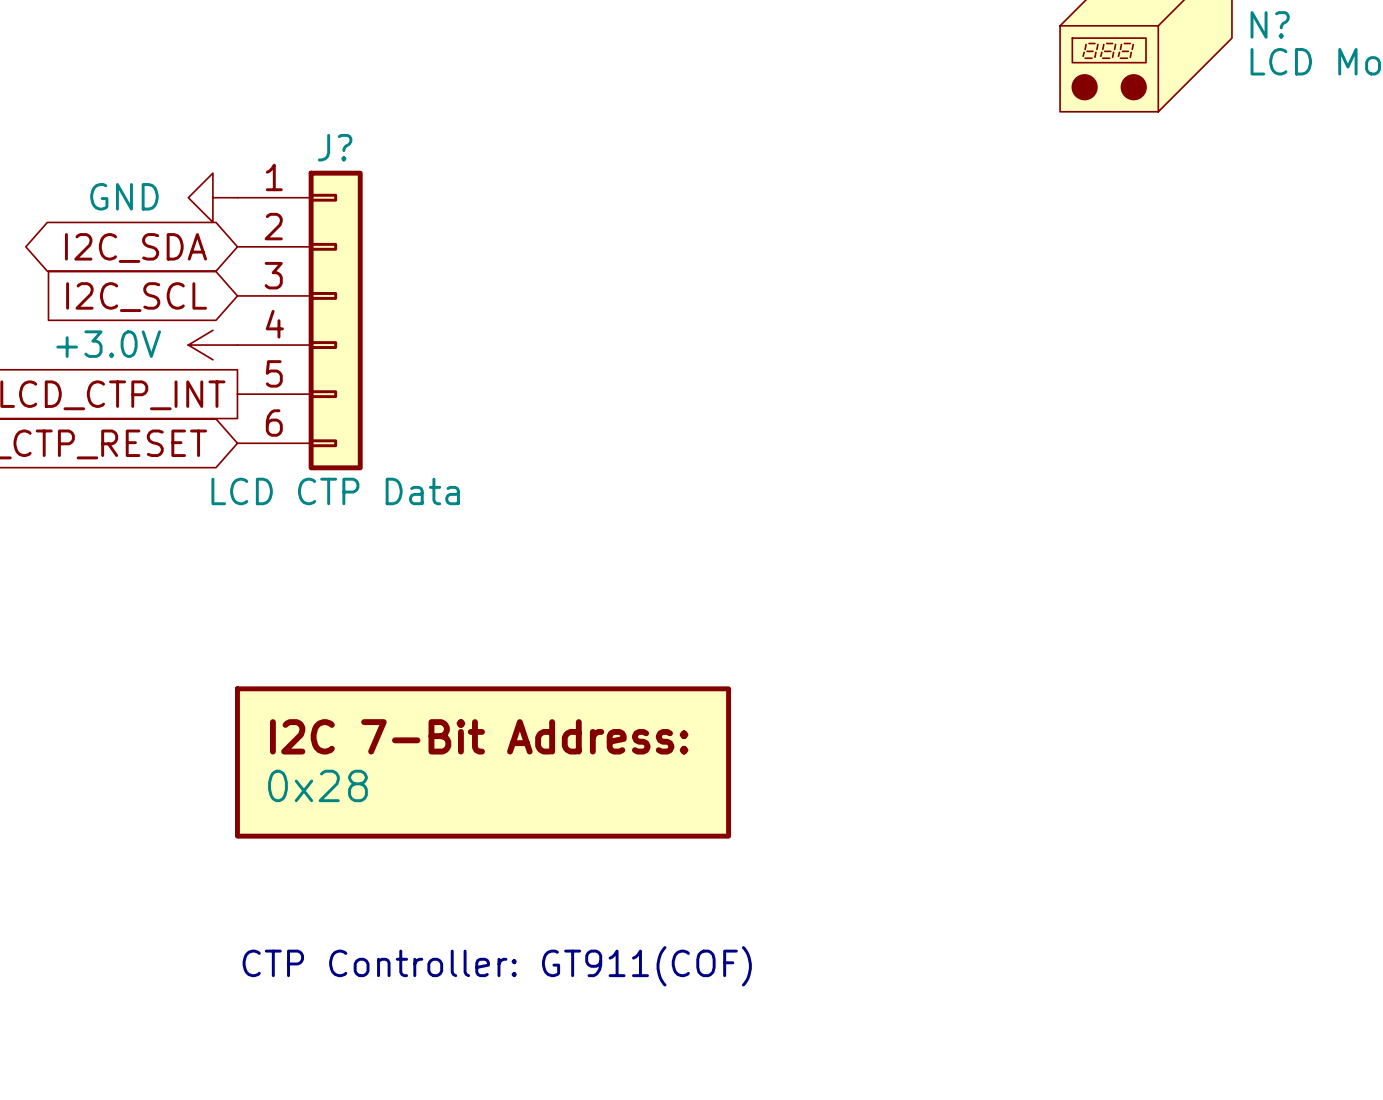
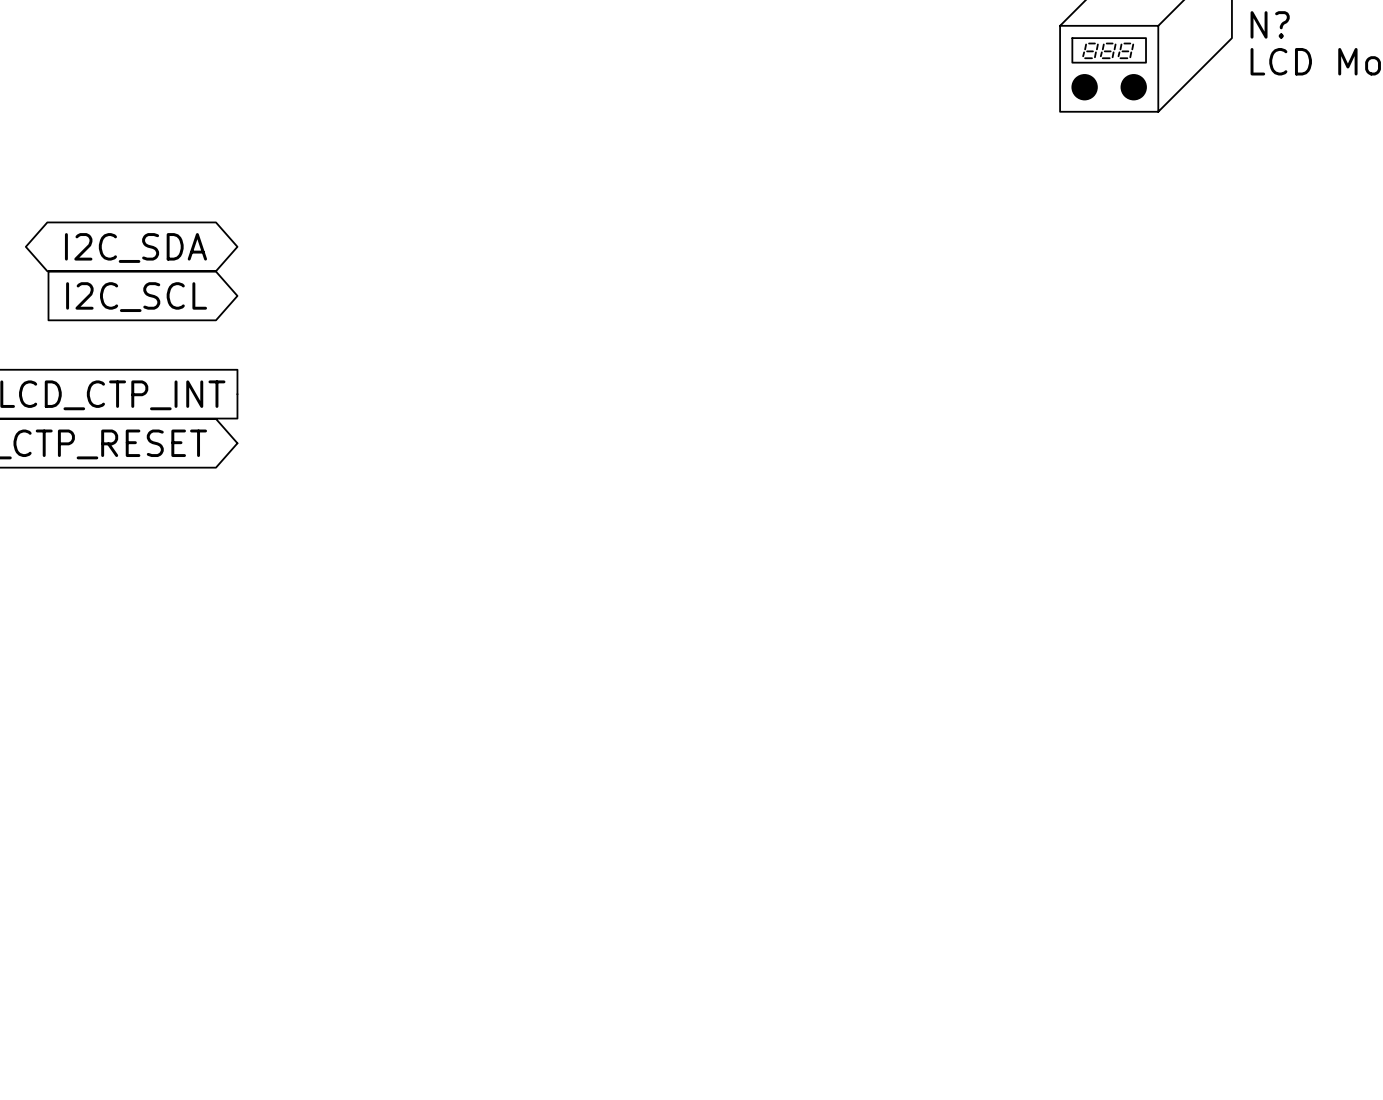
power symbol: GND (212, 197) -> none
J?: LCD CTP Data (300, 320) -> none
power symbol: +3.0V (212, 345) -> none
part: 0x28 (483, 762) -> none
text: CTP Controller: GT911(COF) (497, 966) -> none

